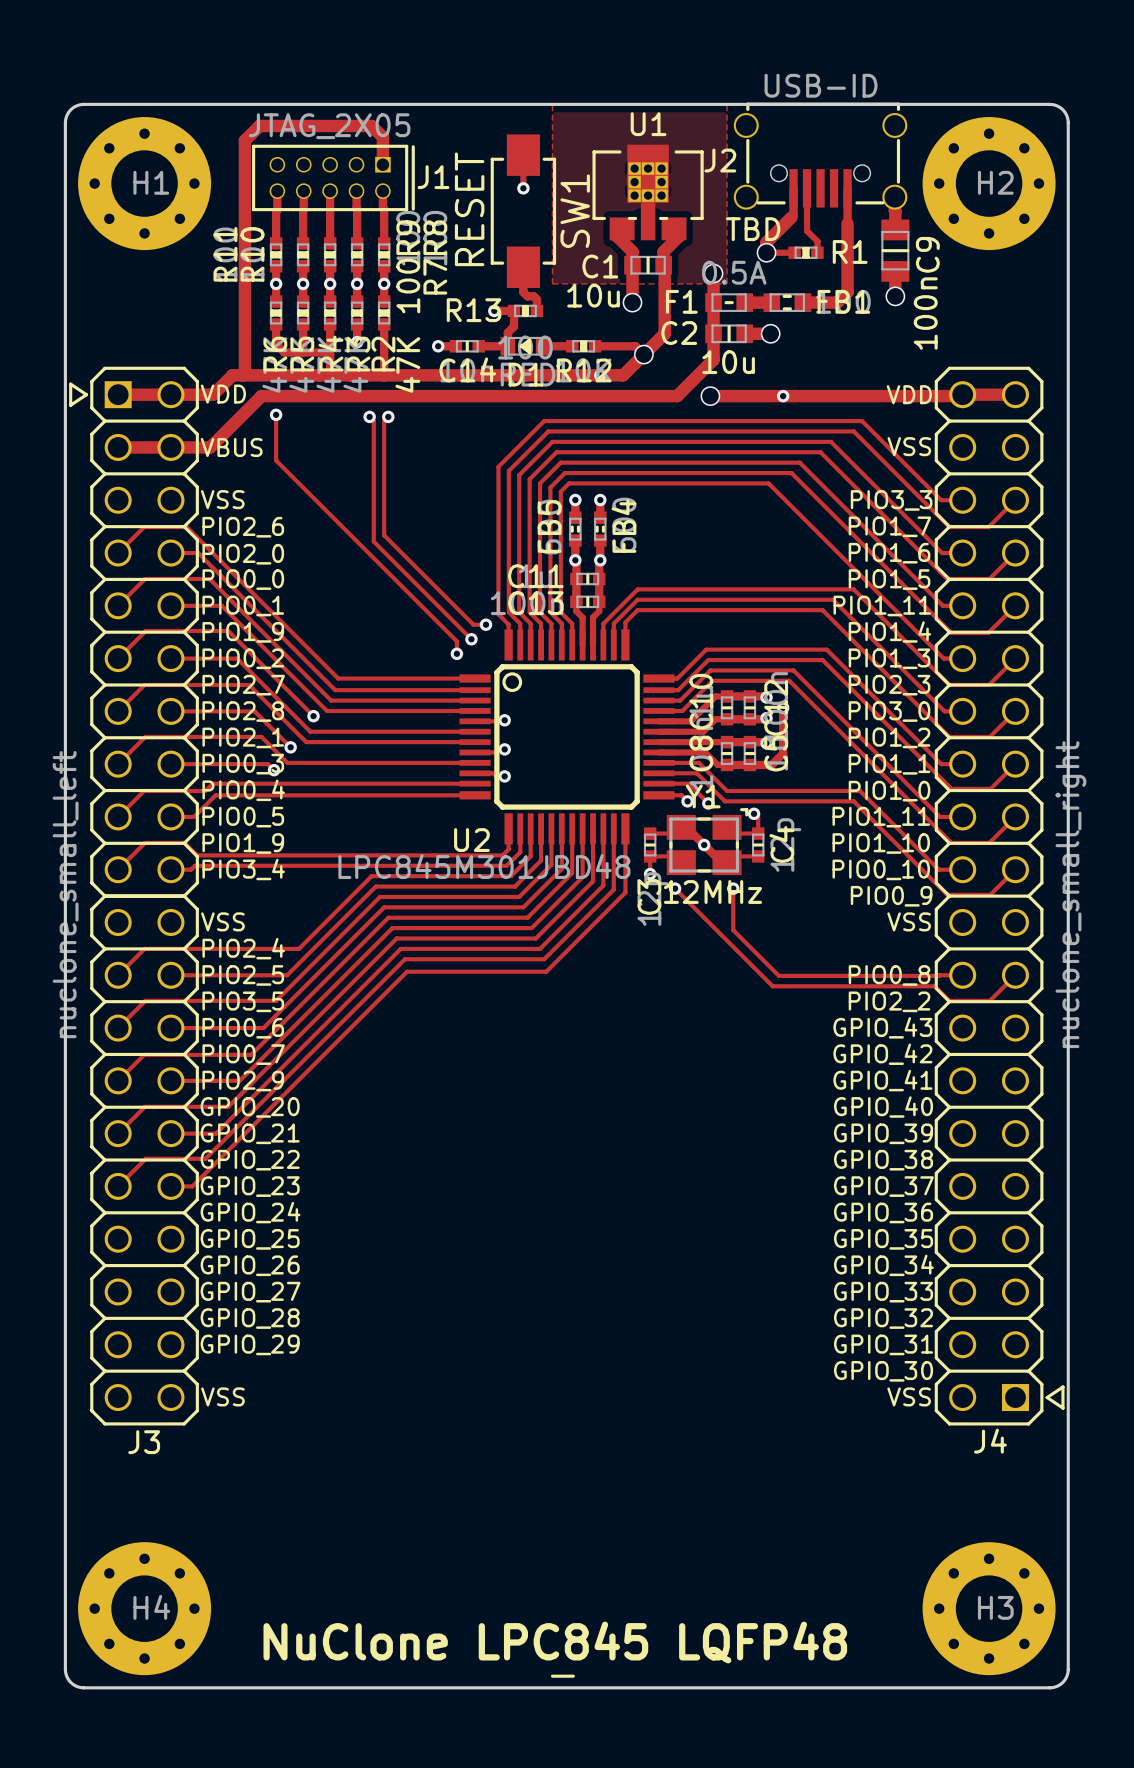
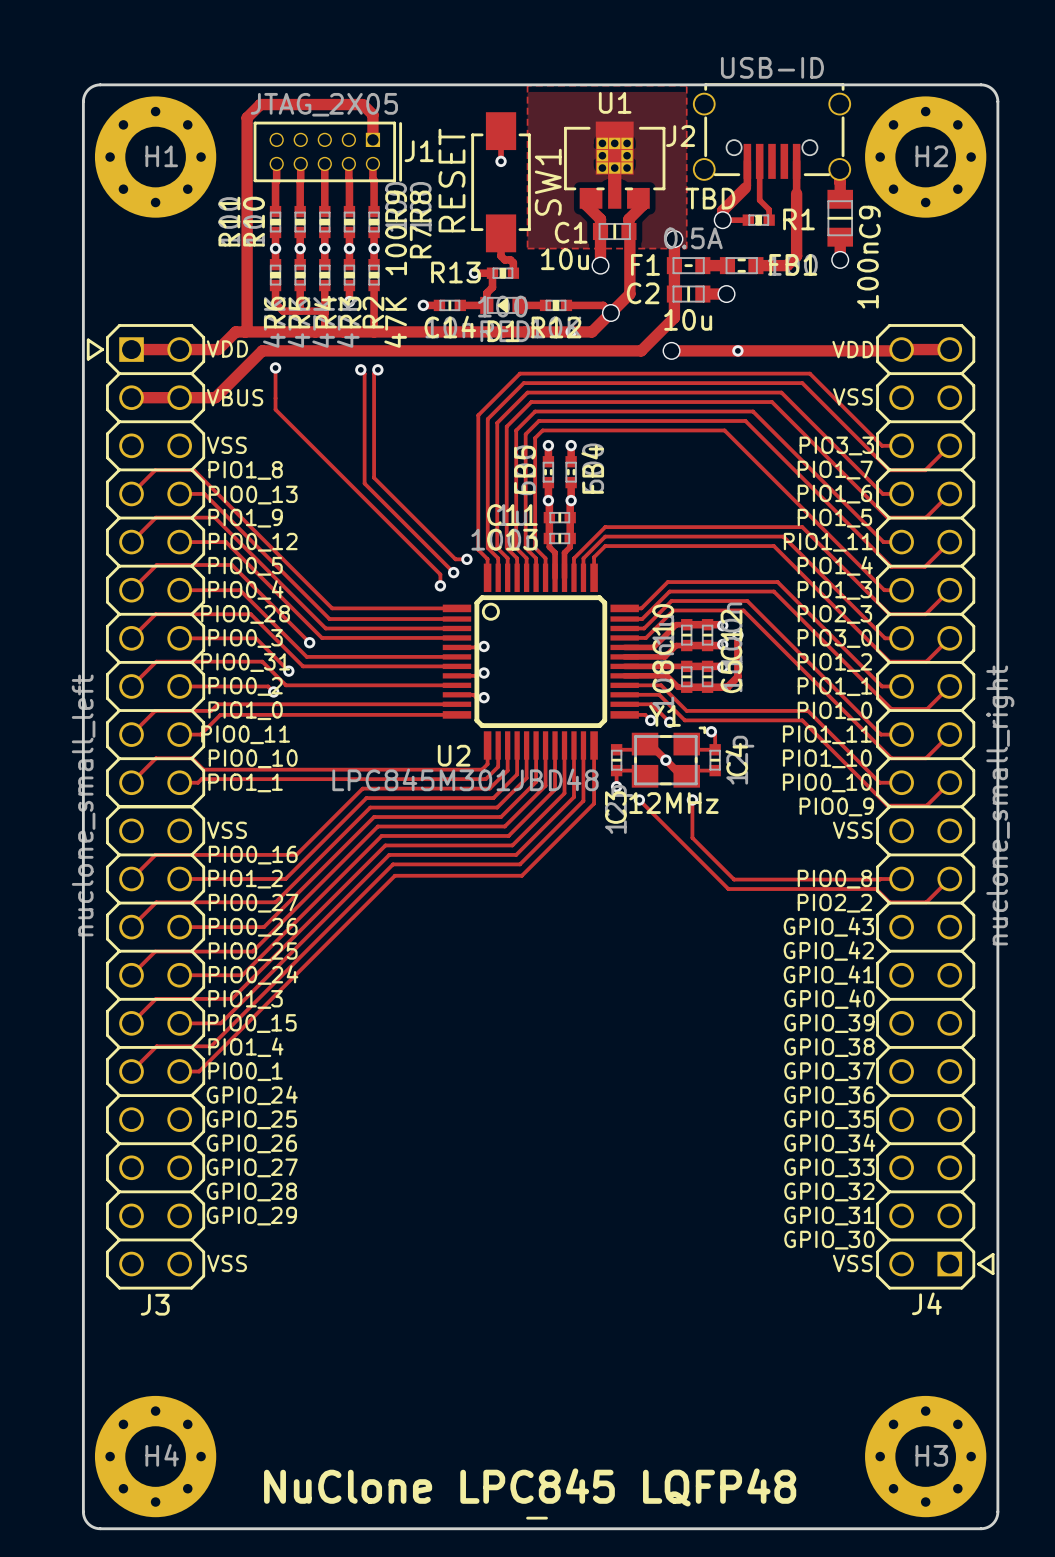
J3 footprint: [69, 366, 199, 1426] -> [86, 324, 206, 1290]

